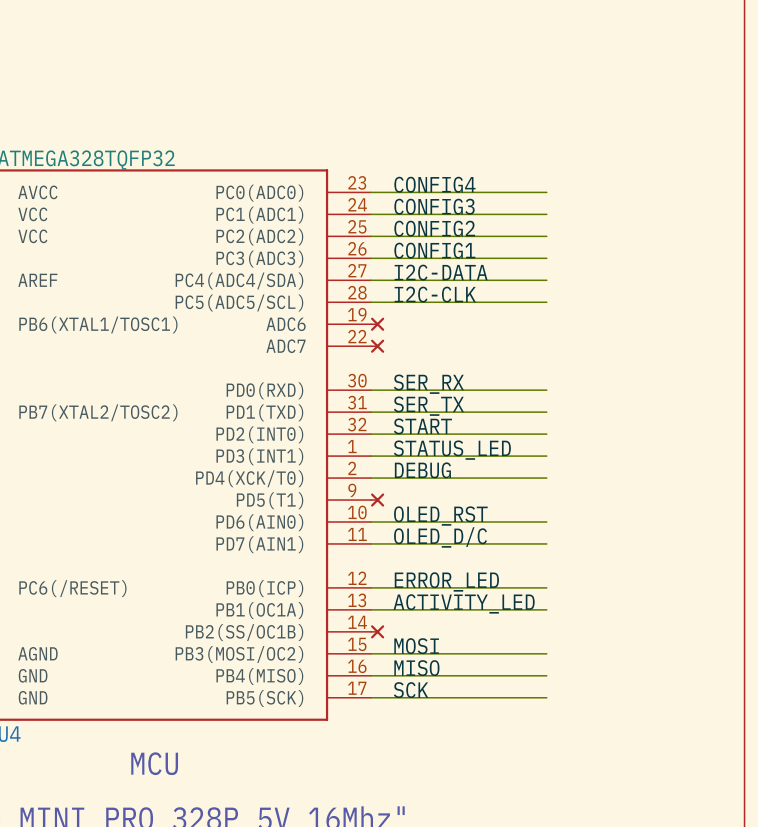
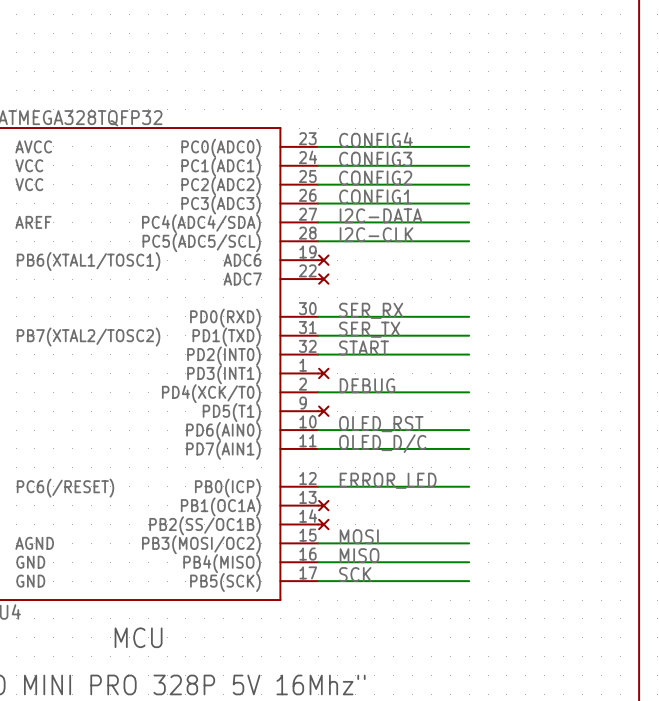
label: STATUS_LED (452, 450) -> none
wire: (371, 456) (546, 456) -> none
part: none -> (323, 373)
label: ACTIVITY_LED (464, 603) -> none
wire: (371, 609) (546, 609) -> none
part: none -> (323, 505)

